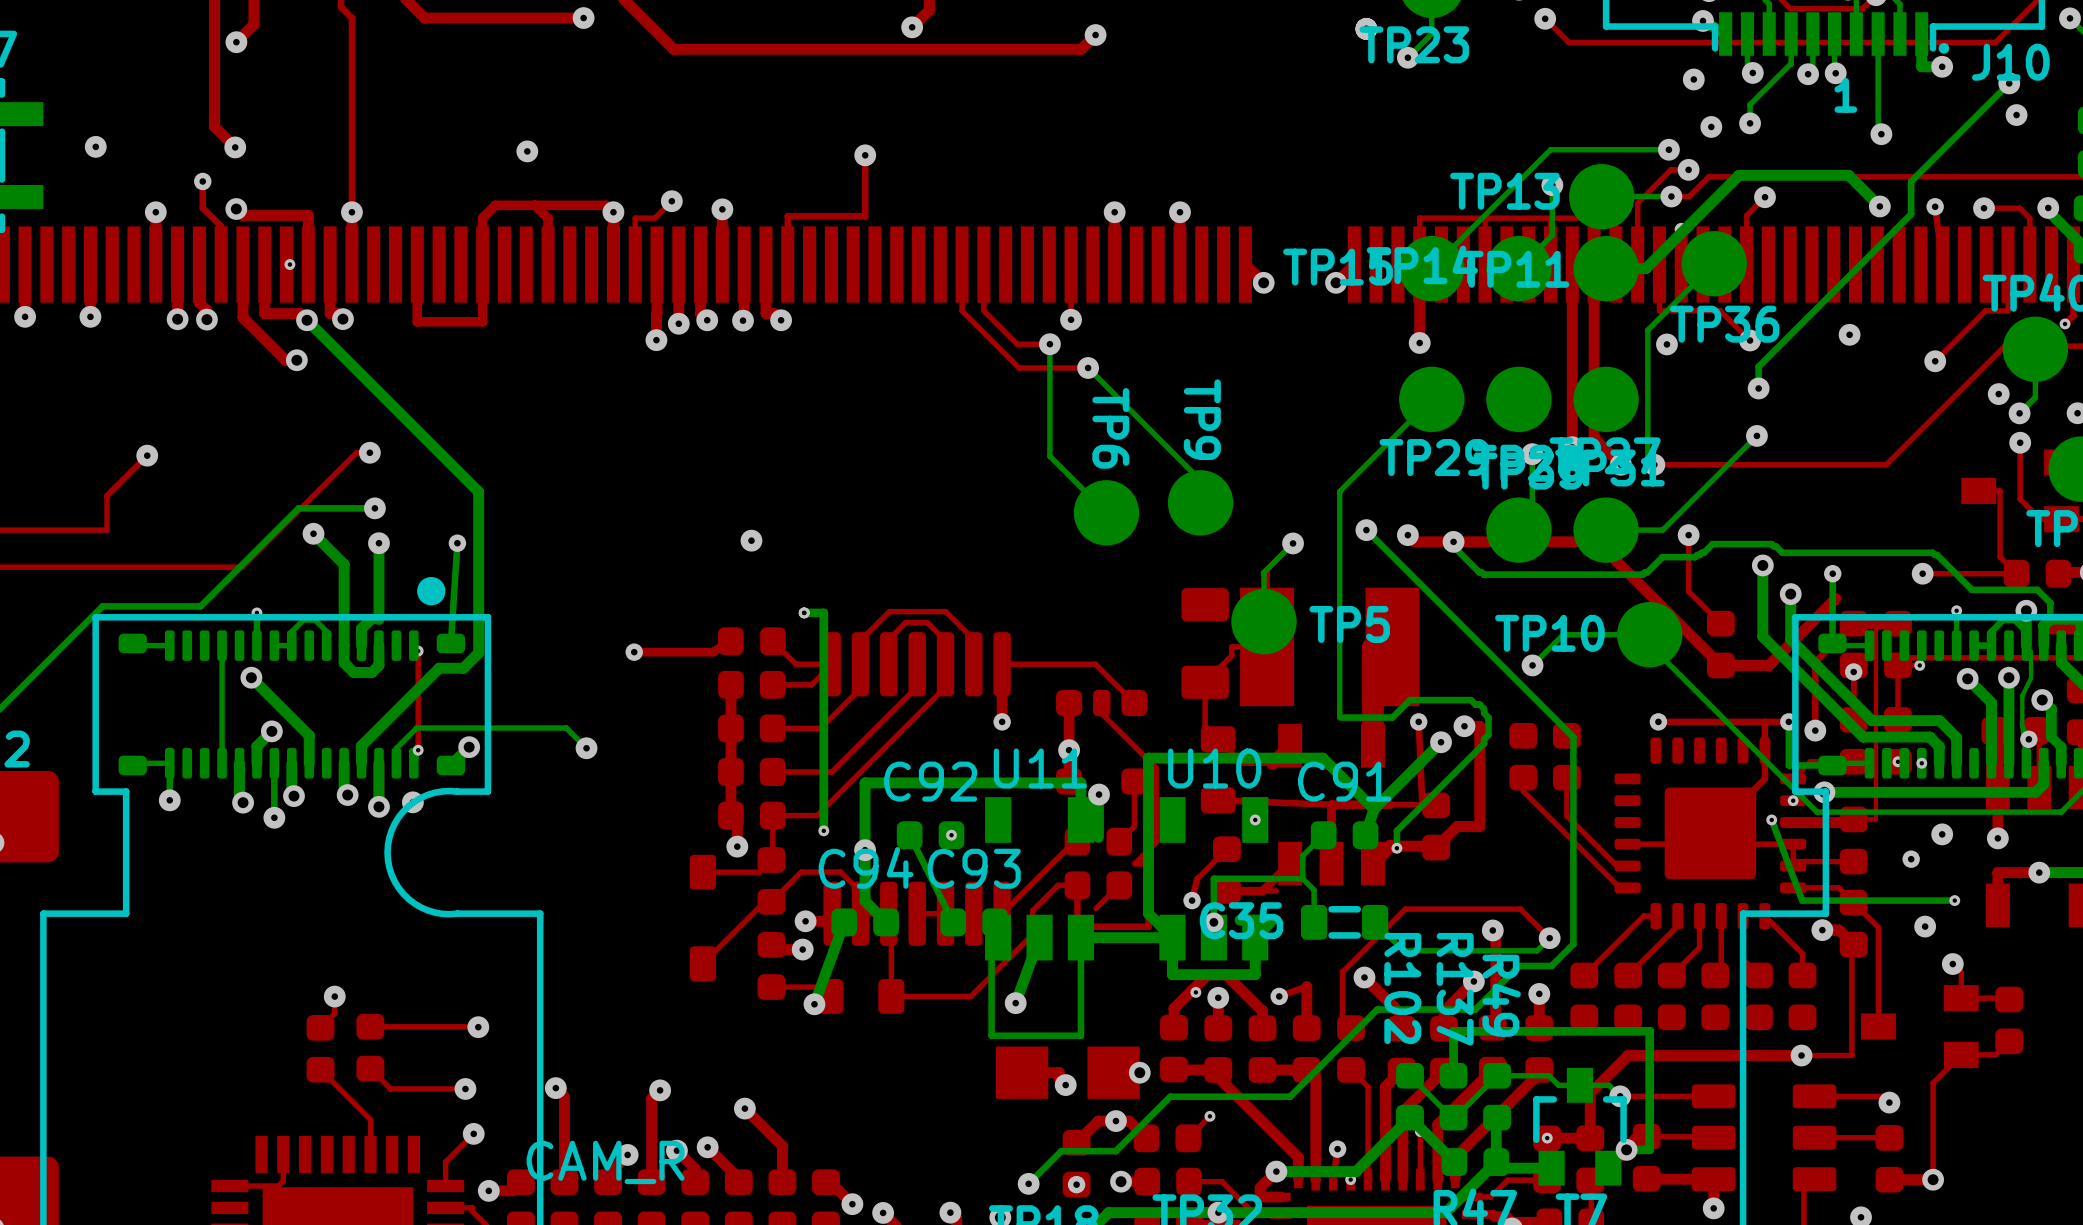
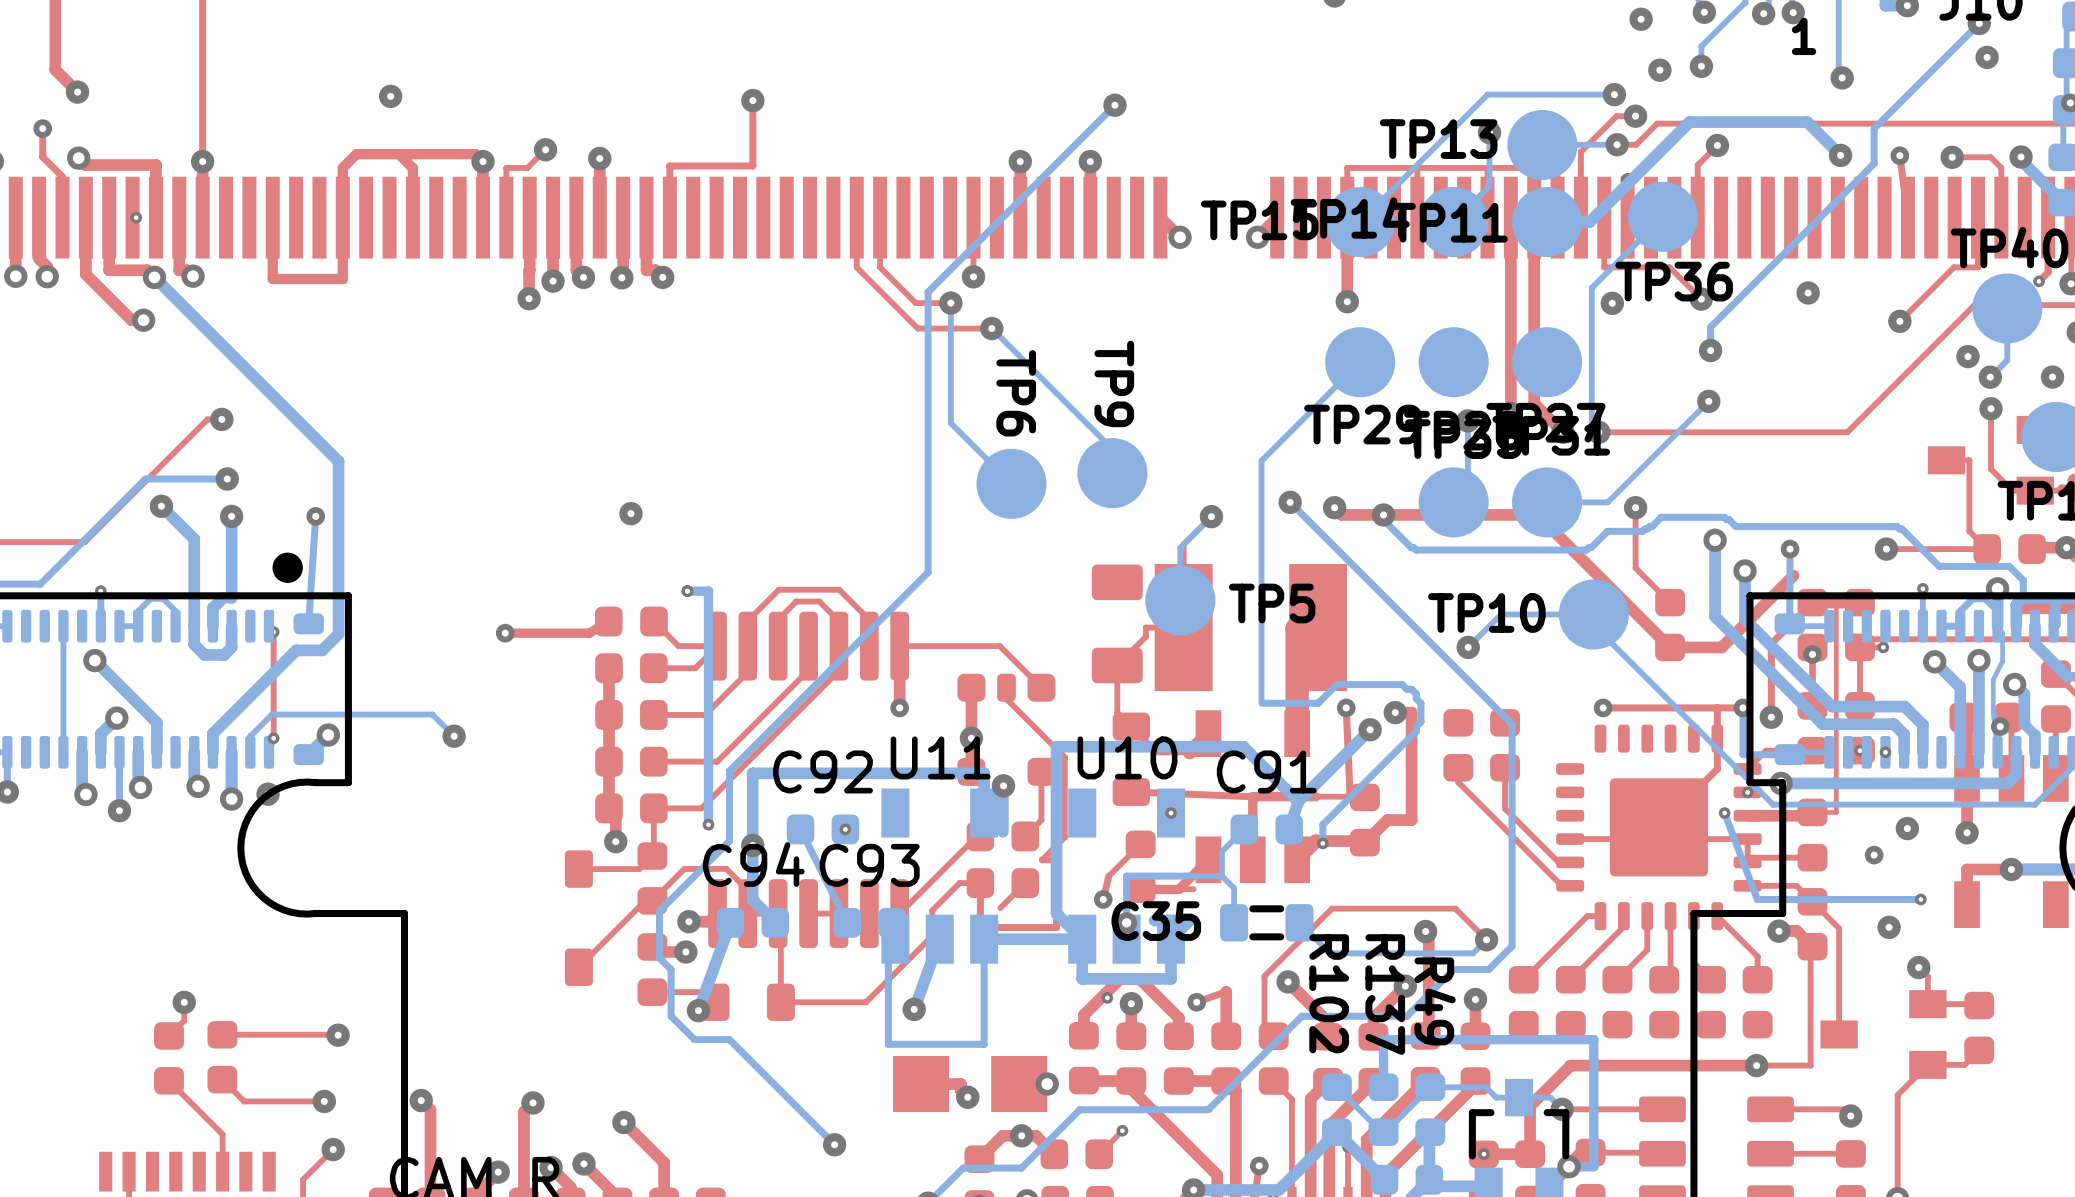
bottom track: none -> (1114, 105) (928, 292) (928, 572) (729, 771) (729, 841) (659, 911) (659, 957) (671, 969) (671, 1016) (694, 1039) (729, 1039) (834, 1144)
via: none -> (1114, 105)
via: none -> (834, 1144)

